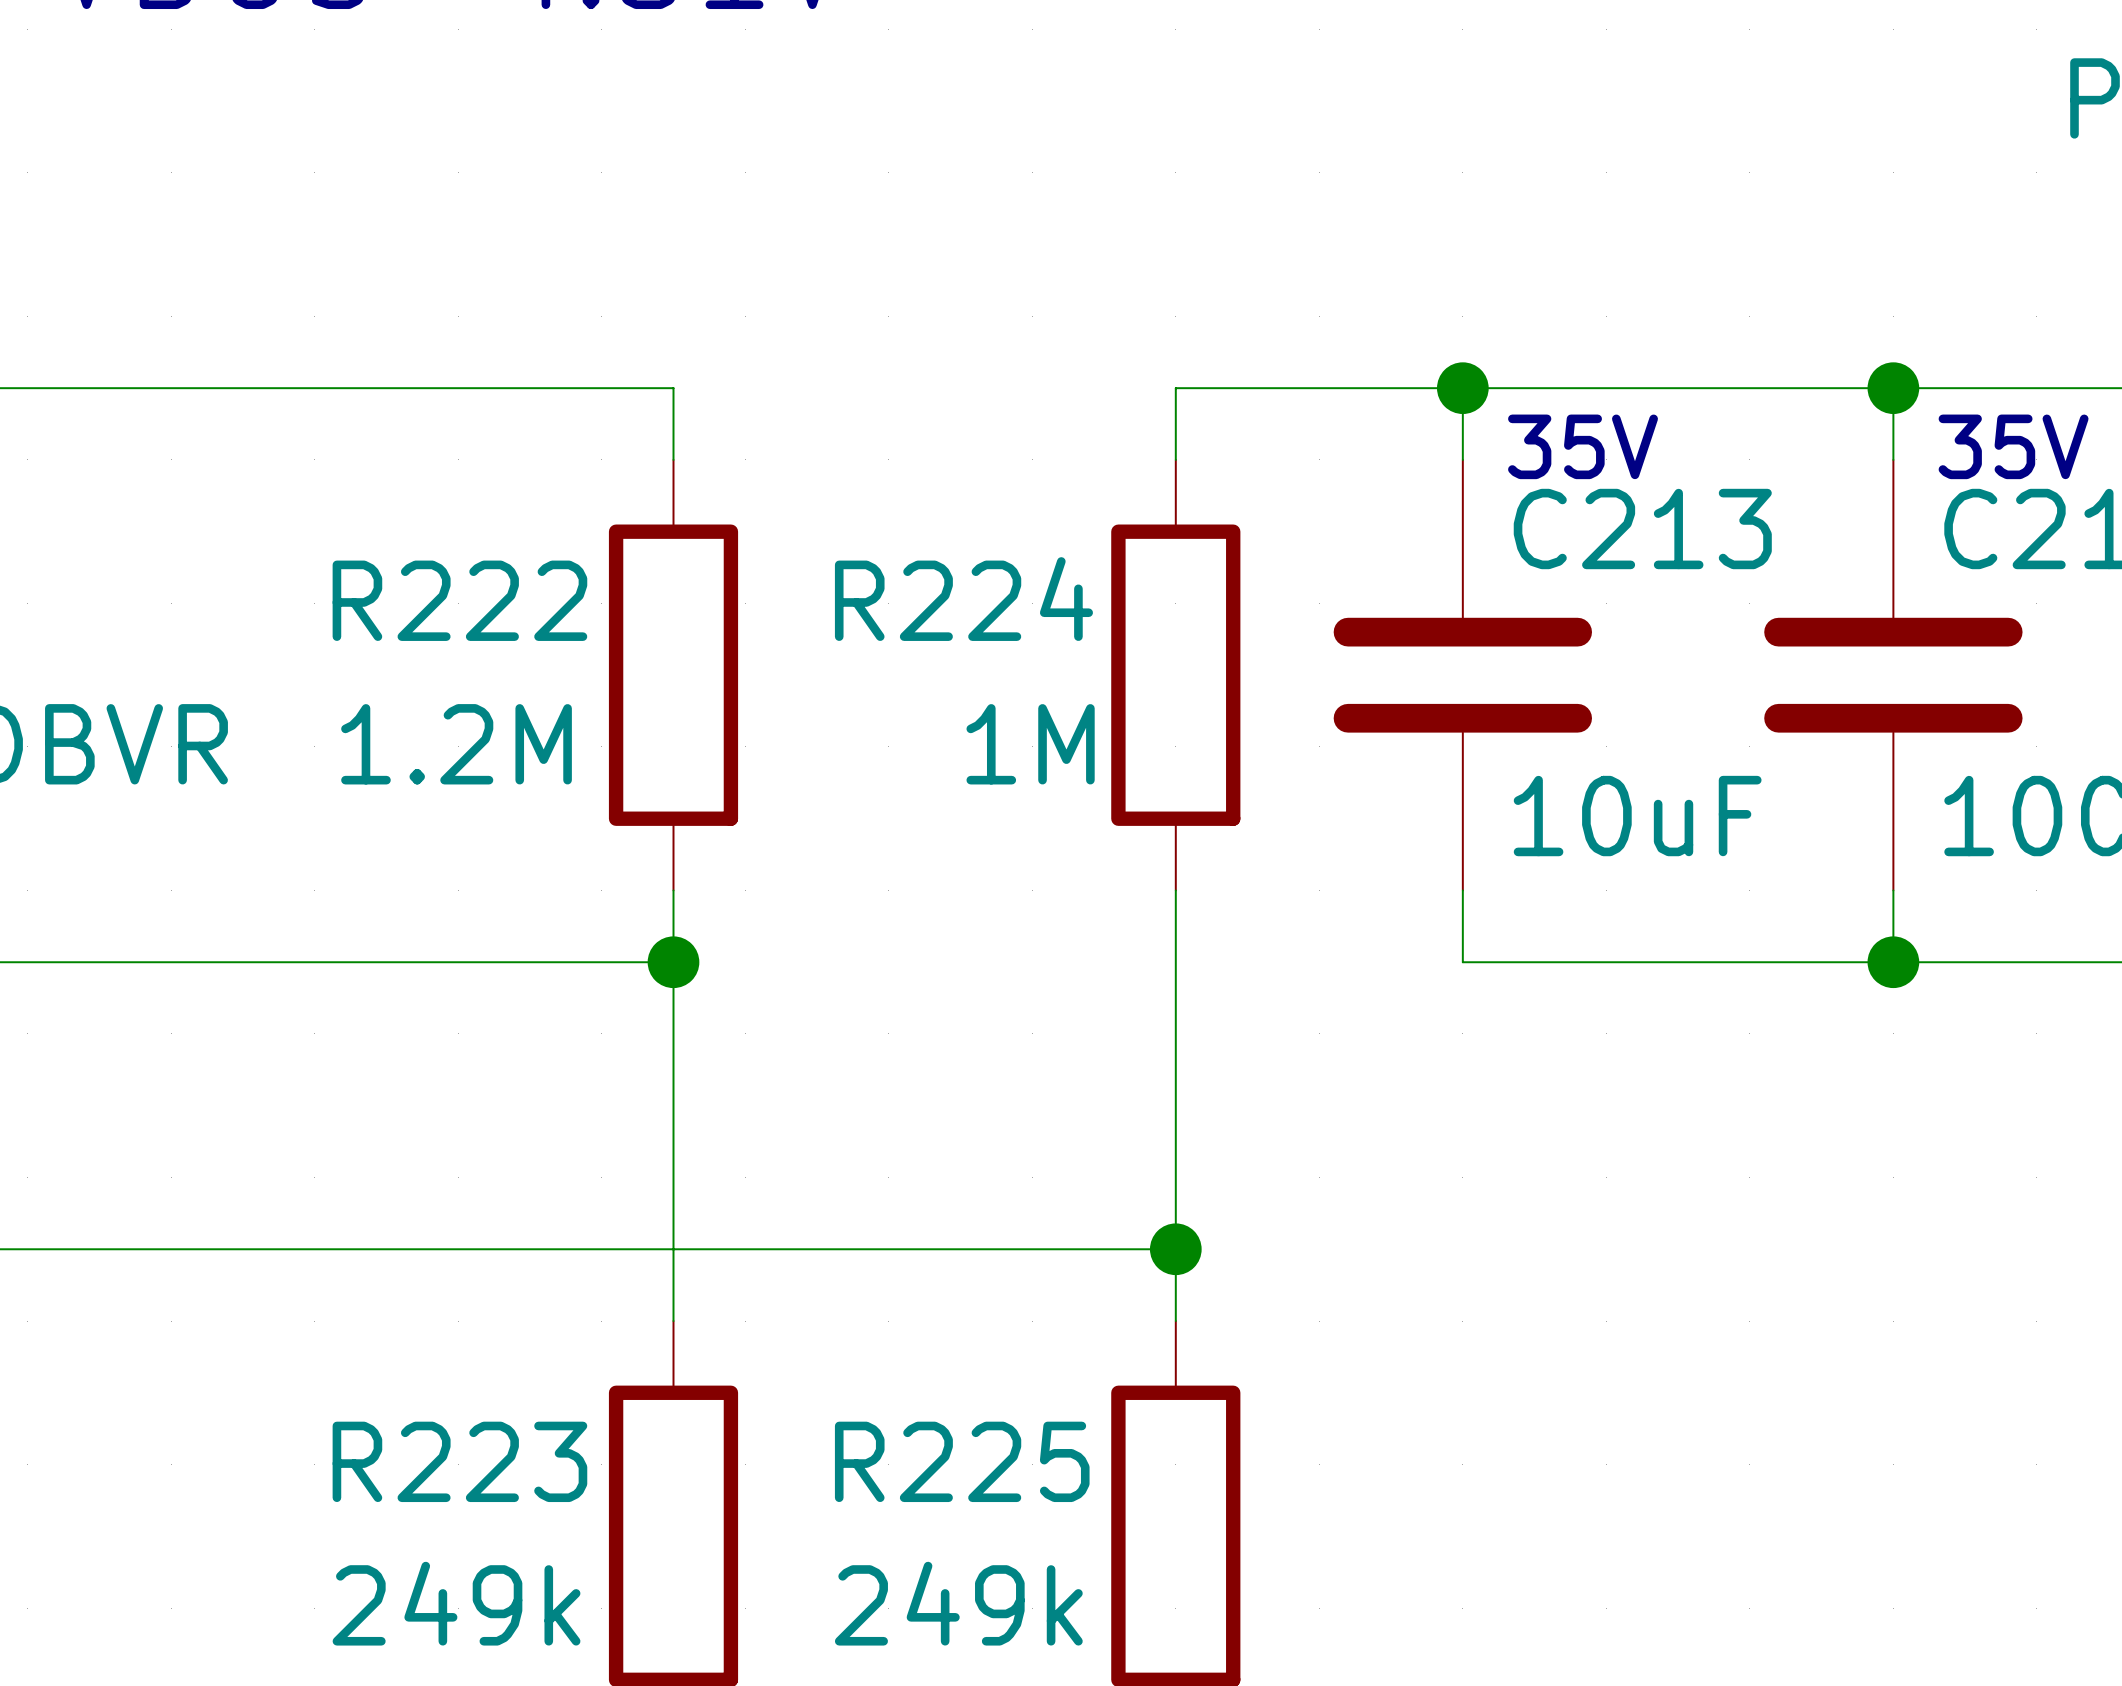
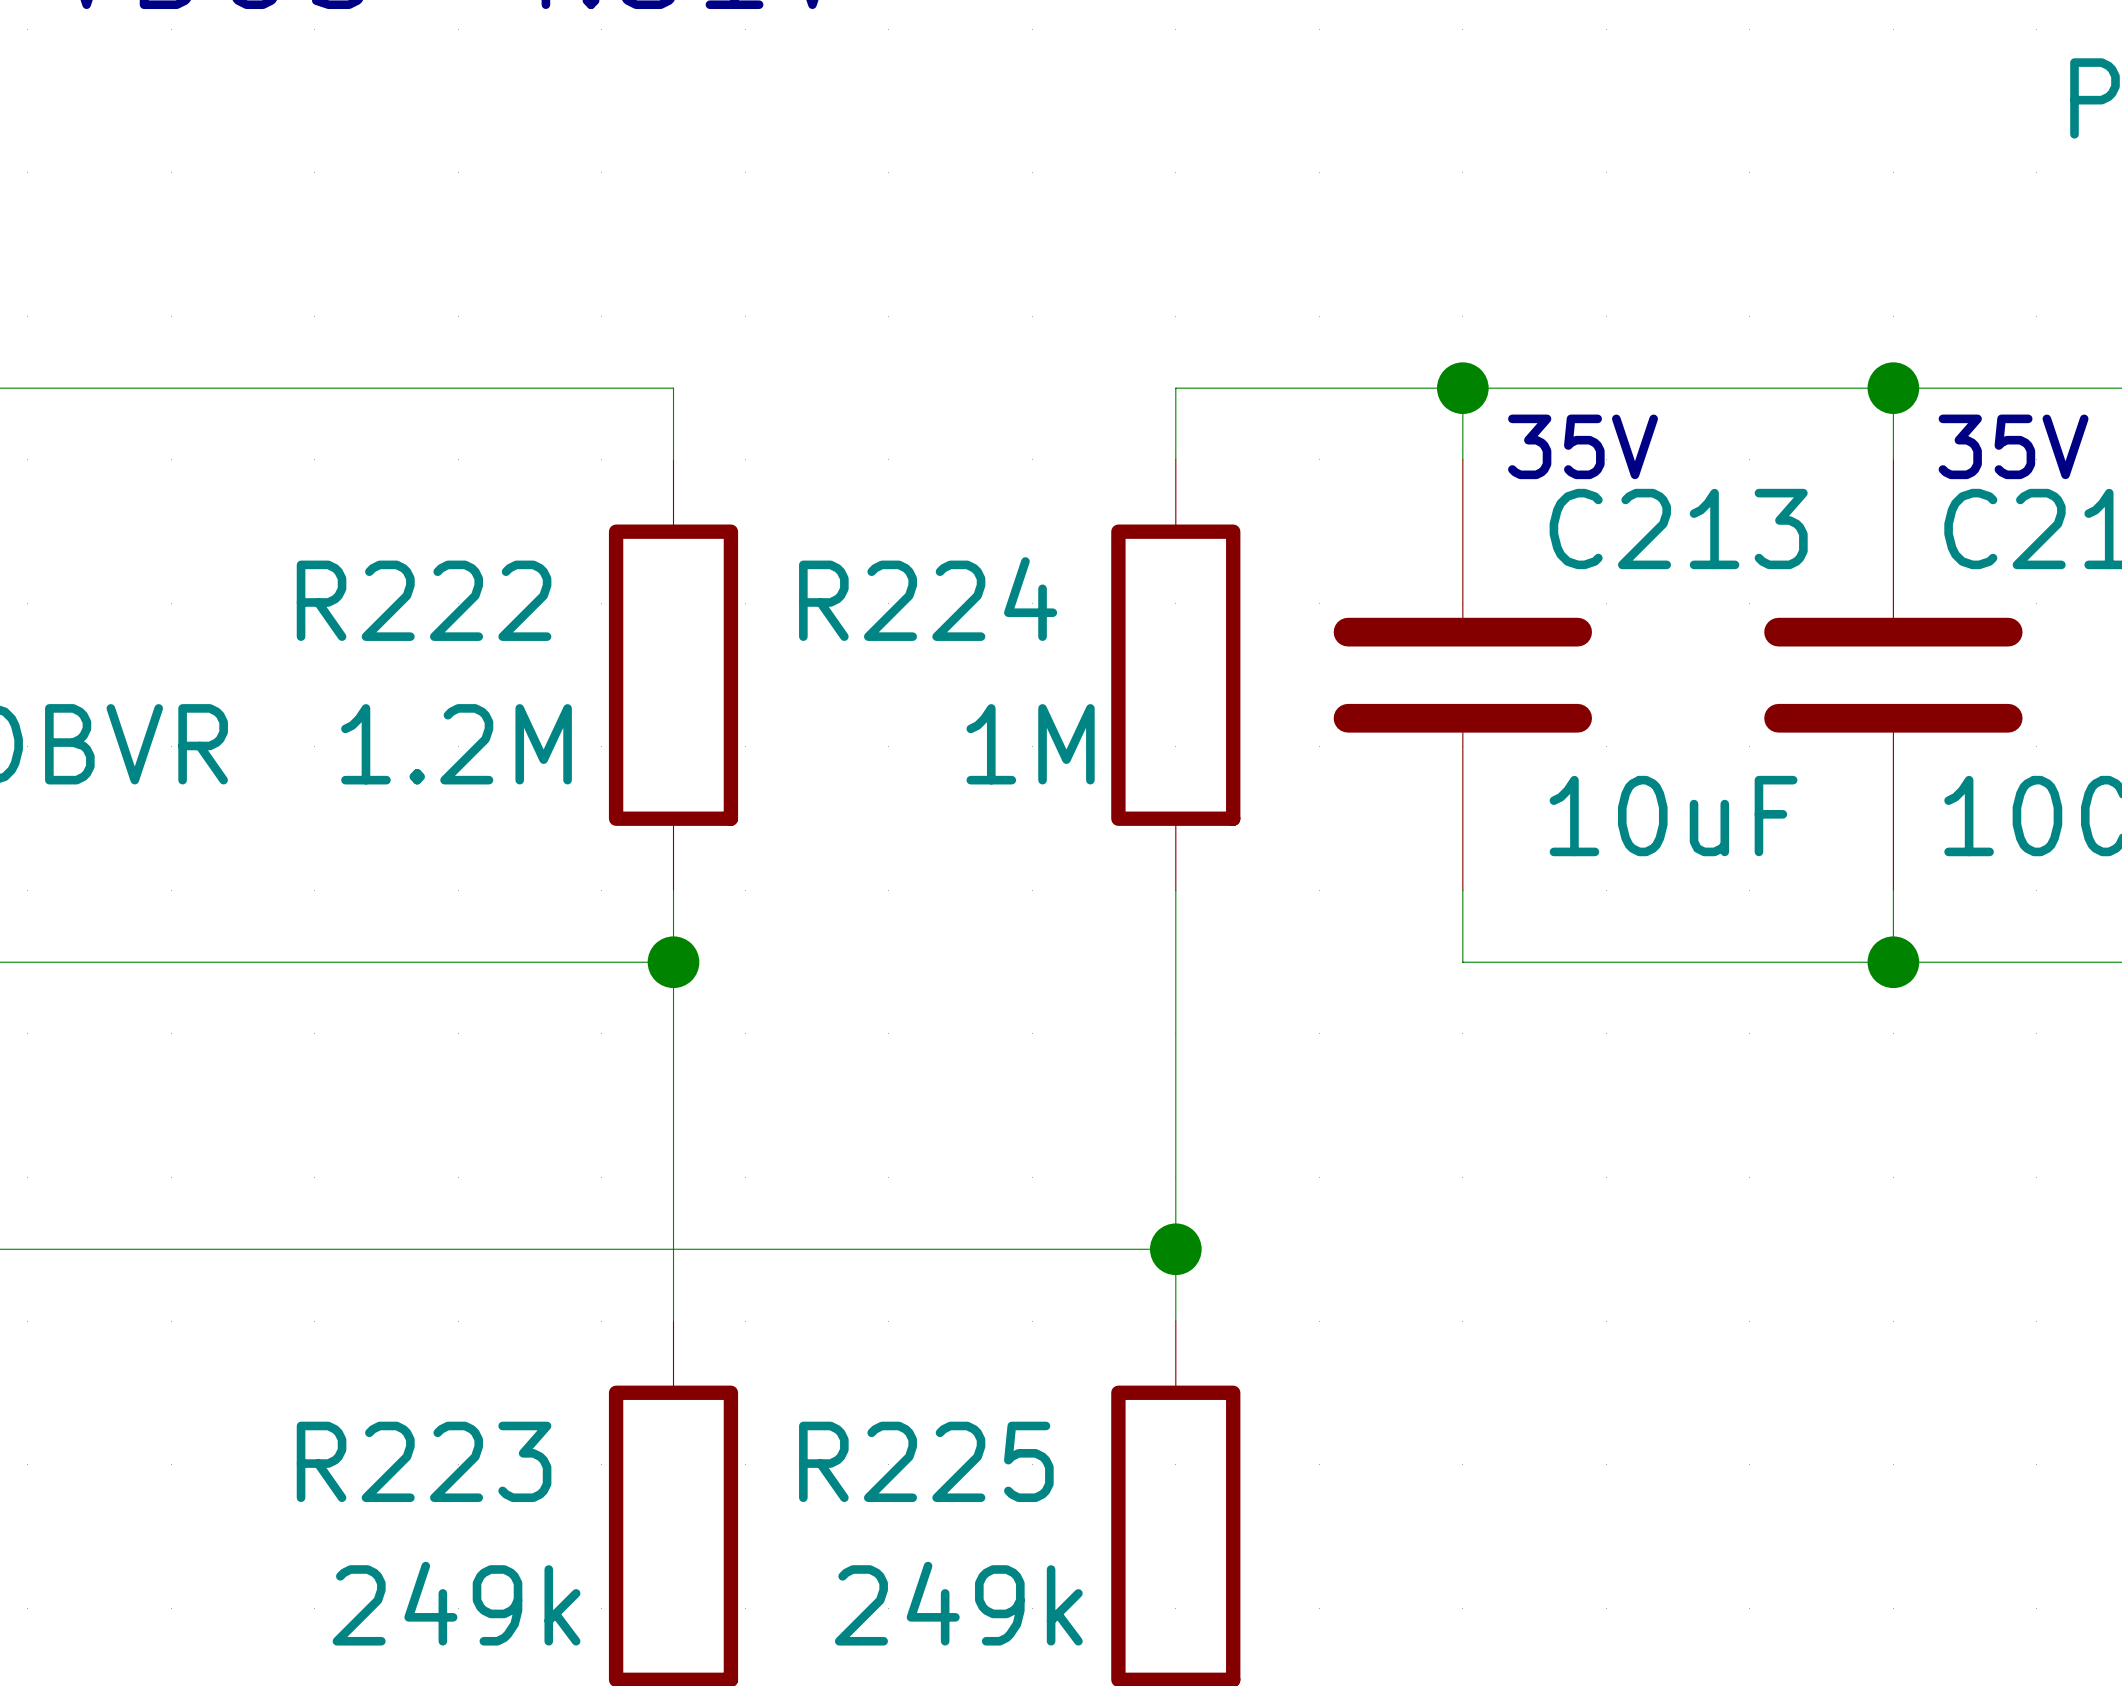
C213 name position: C213 (1642, 529) -> C213 (1678, 529)
R224 name position: R224 (963, 599) -> R224 (928, 599)
R222 name position: R222 (459, 600) -> R222 (424, 600)
C213 value position: 10uF (1637, 816) -> 10uF (1673, 816)
R223 name position: R223 (459, 1461) -> R223 (424, 1461)
R225 name position: R225 (962, 1461) -> R225 (926, 1461)

